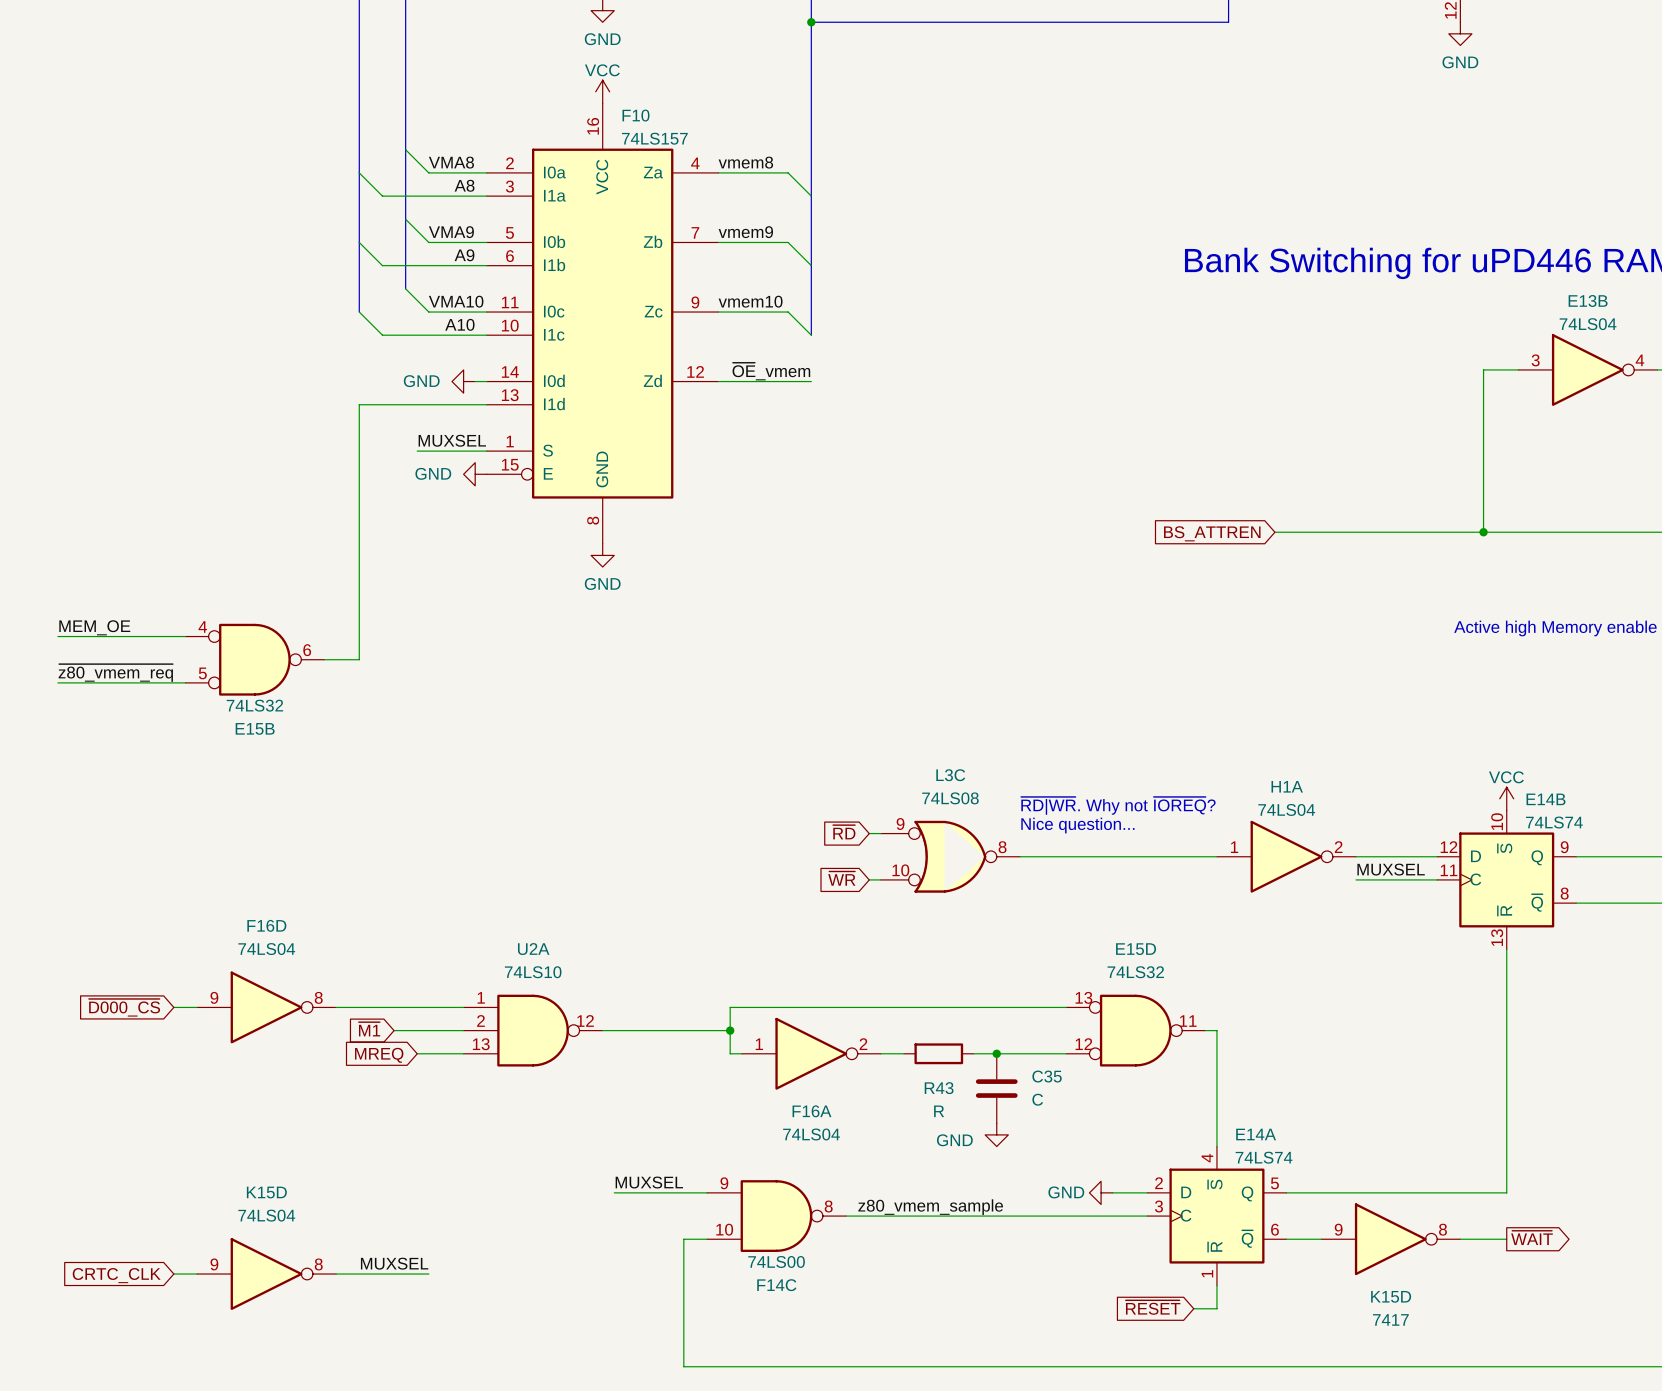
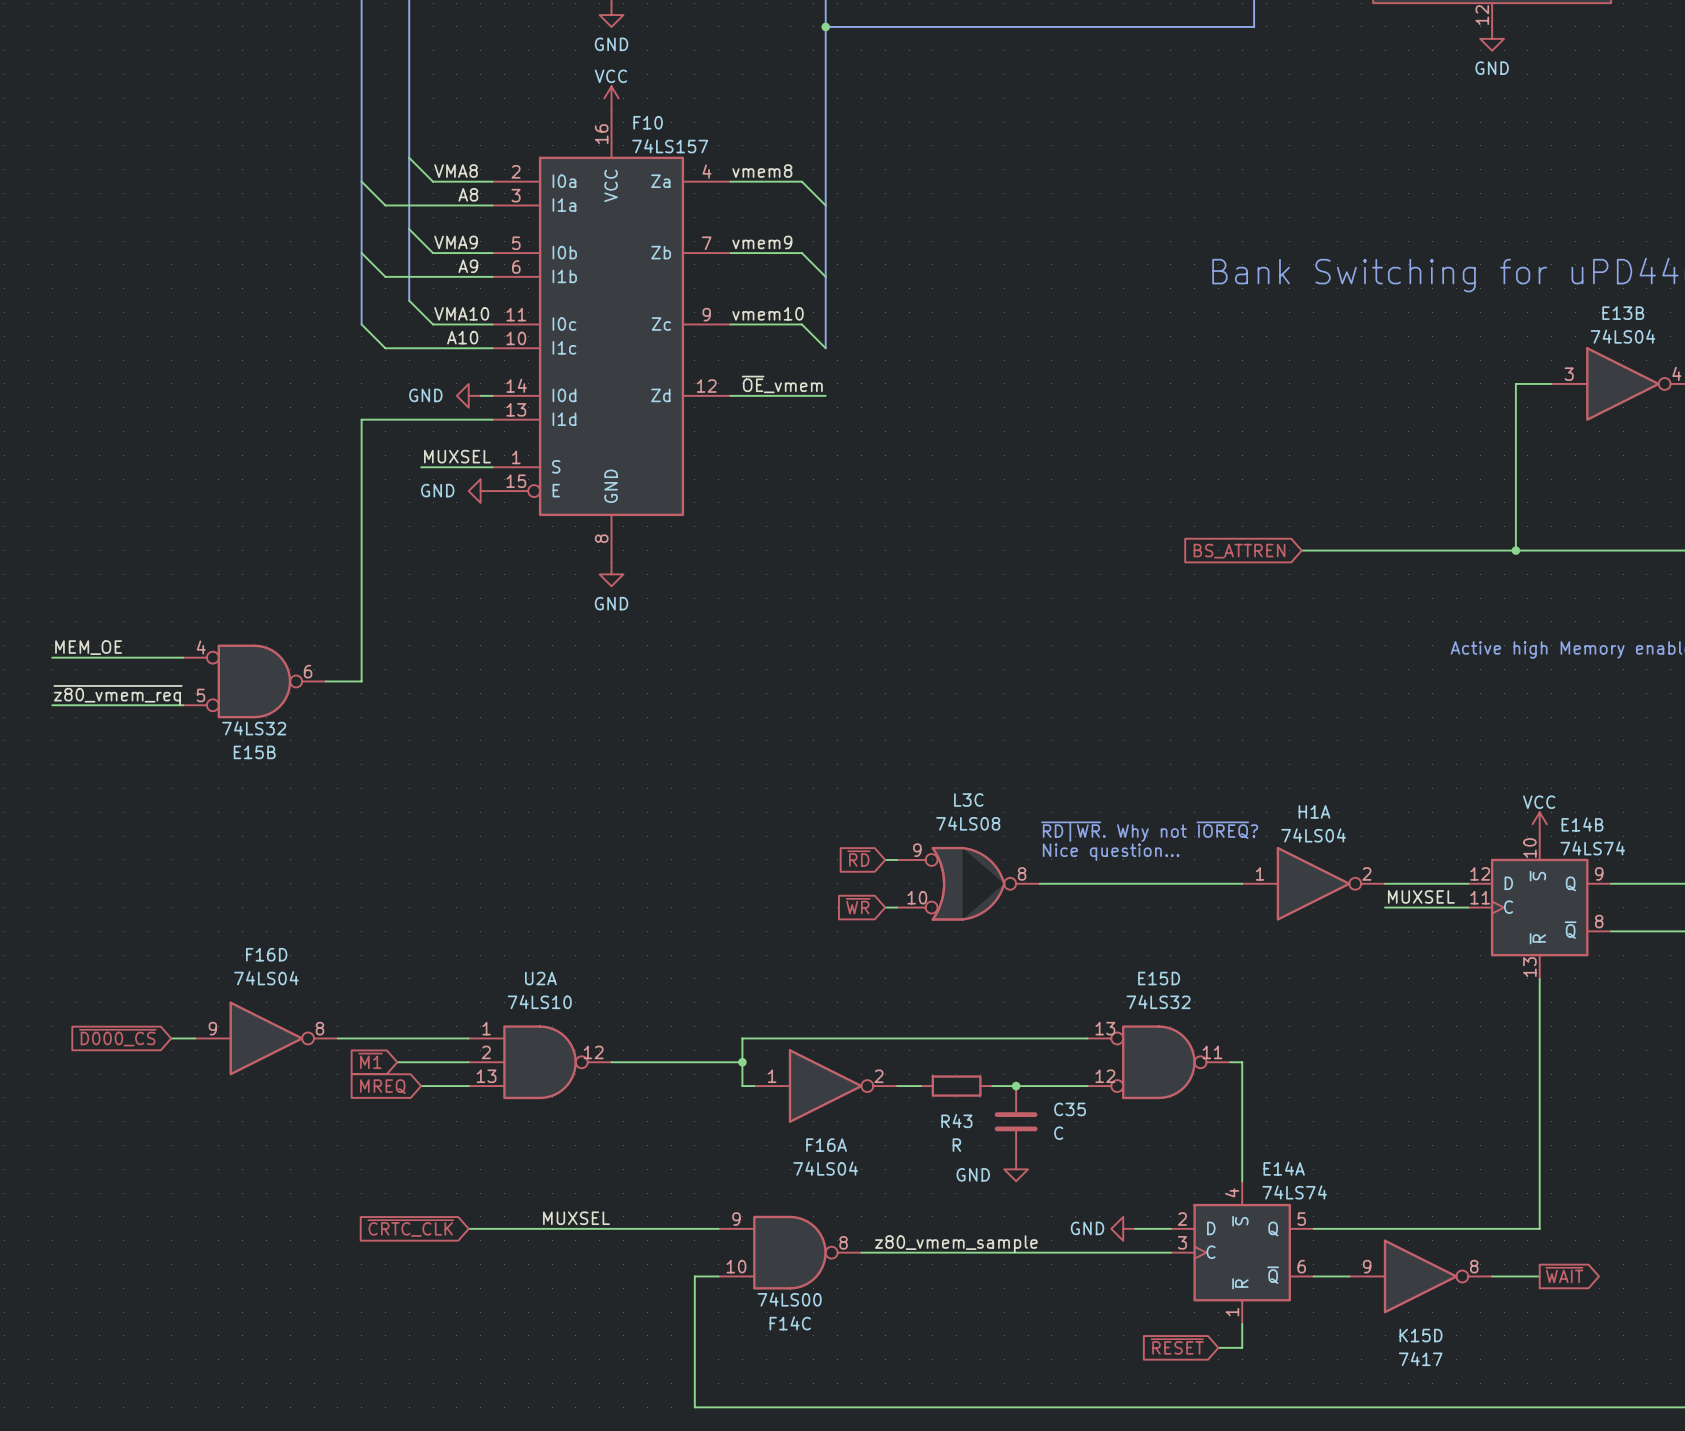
label: none -> MUXSEL (576, 1218)
label: MUXSEL (649, 1182) -> none
wire: none -> (468, 1228) (623, 1228)
global label: none -> ~{CRTC_CLK} (410, 1228)
label: MUXSEL (394, 1263) -> none
wire: (173, 1274) (197, 1274) -> none
K15D: 74LS04 (266, 1274) -> none
wire: (336, 1274) (428, 1274) -> none
global label: CRTC_CLK (116, 1275) -> none

